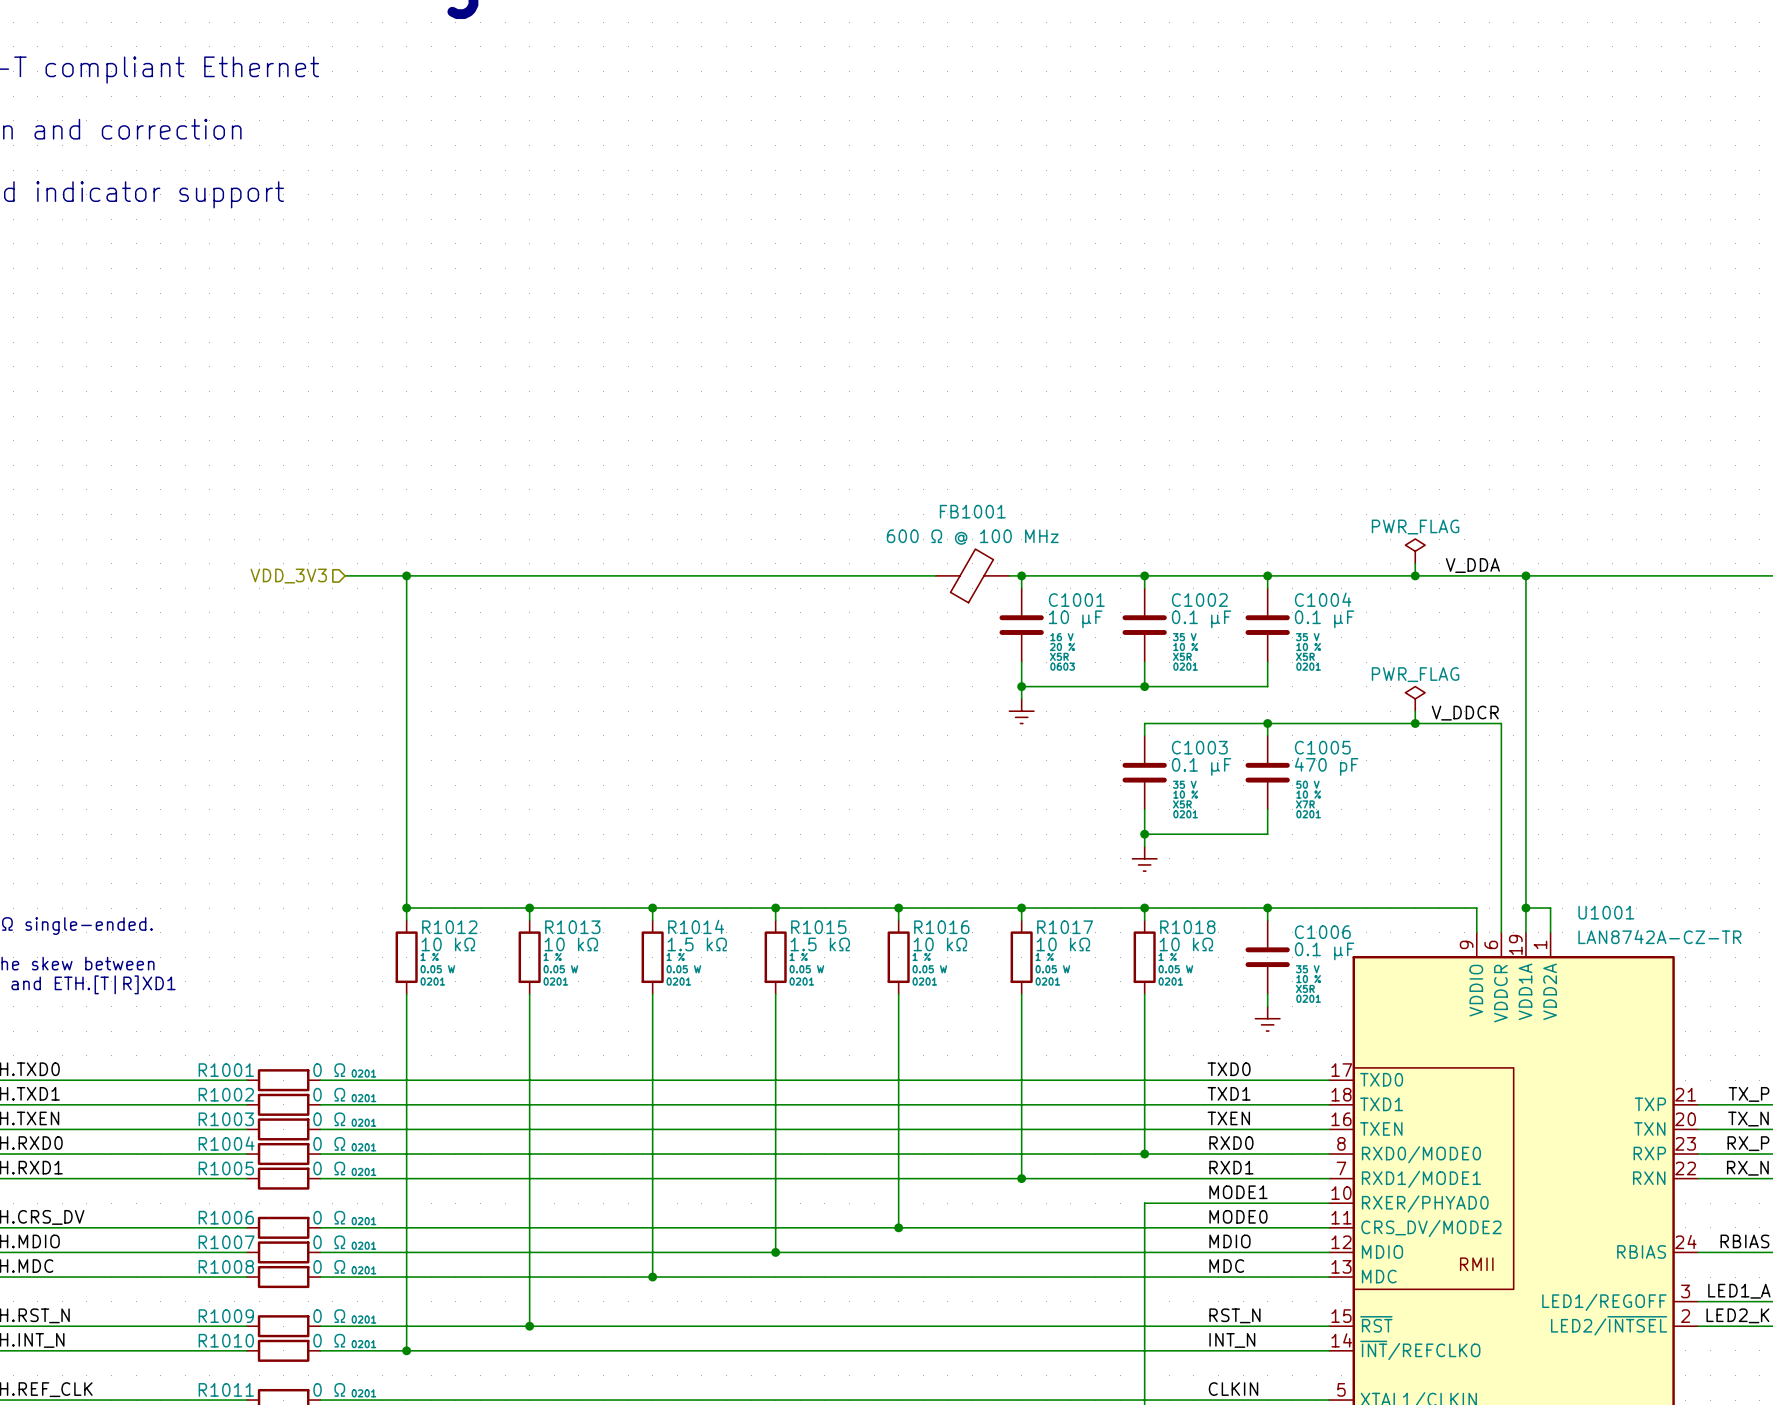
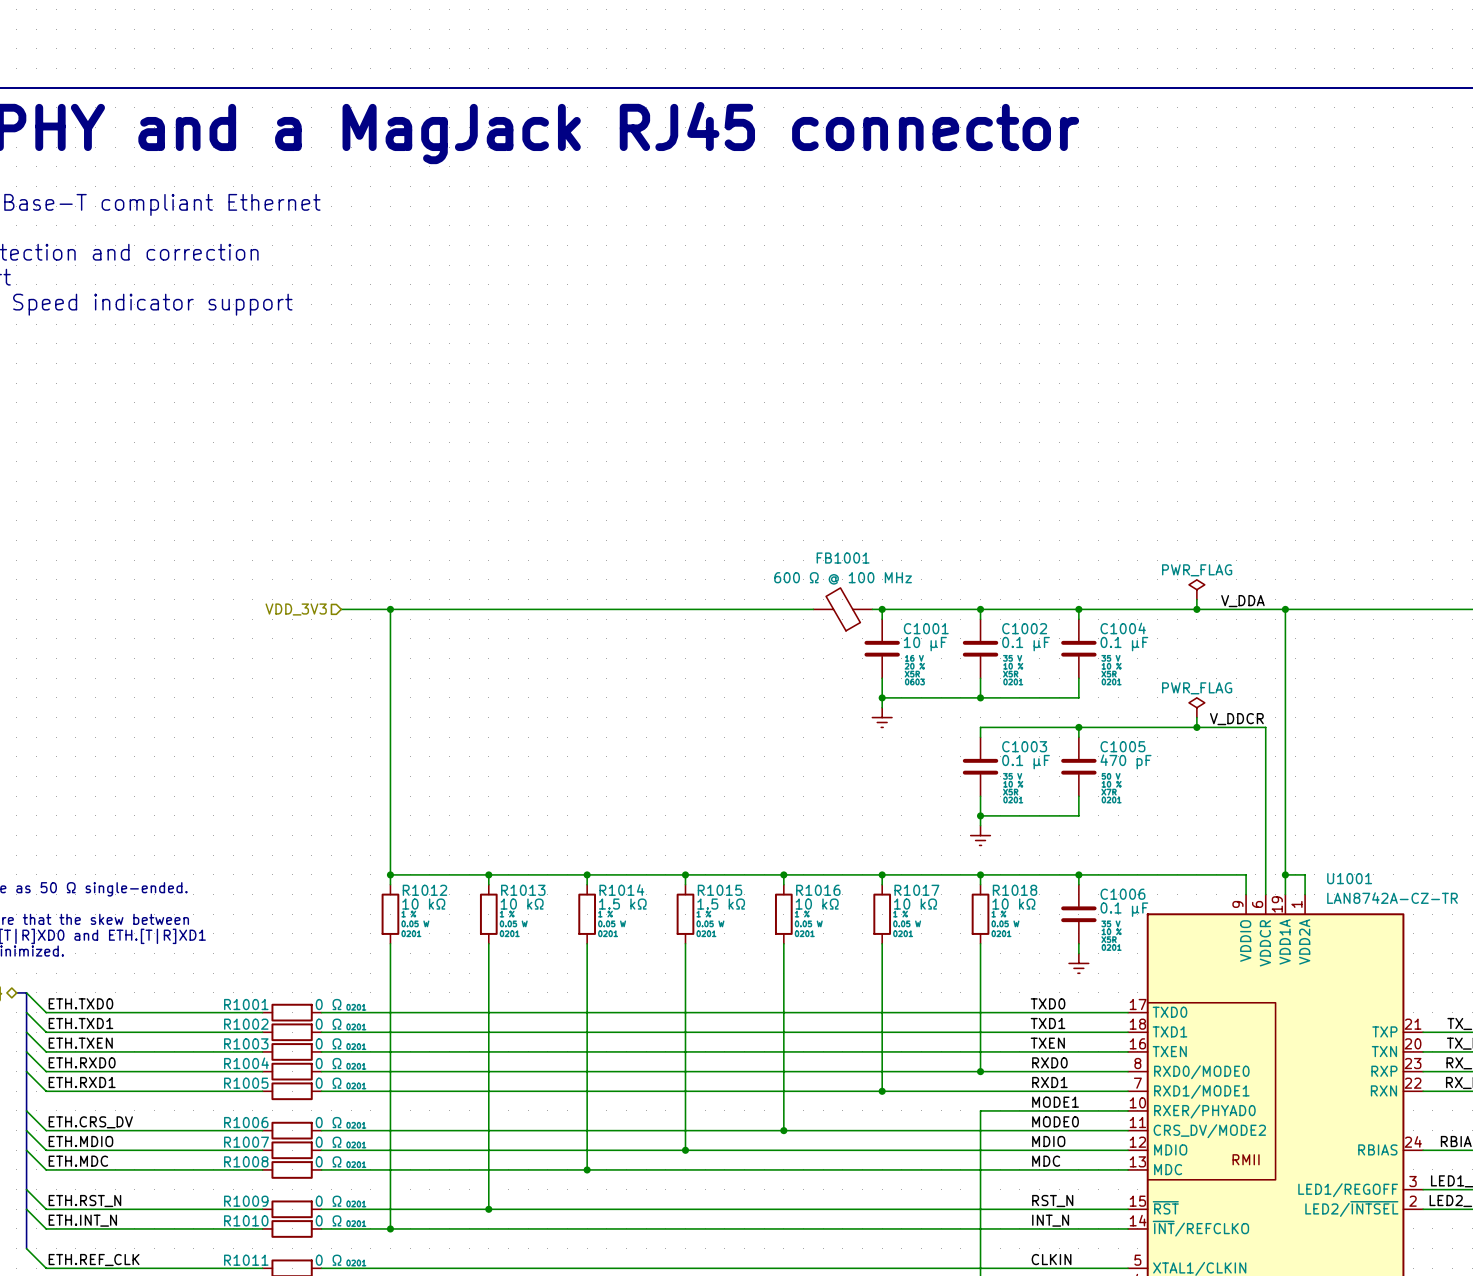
FB1001 flip: as is (971, 575) -> left-right (843, 609)

